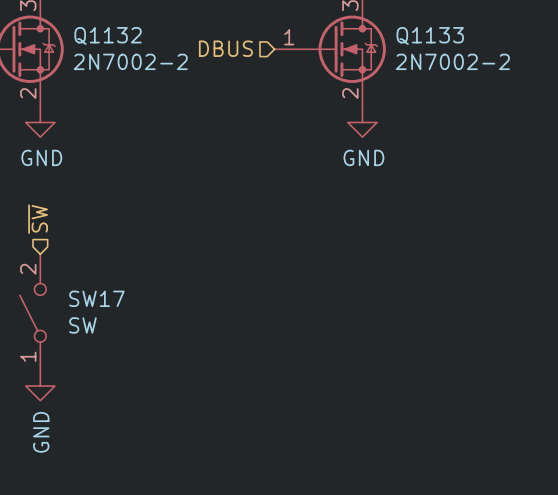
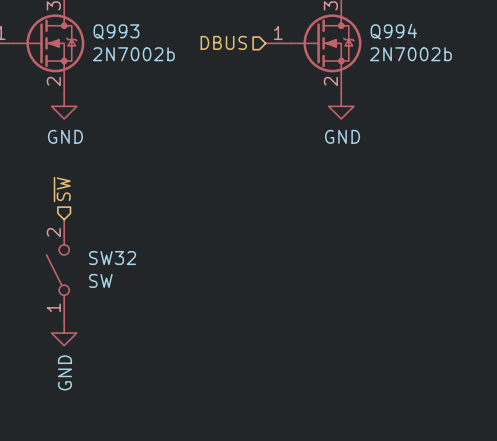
Q1132 name: Q1132 (108, 35) -> Q993 (116, 31)
Q1133 name: Q1133 (430, 35) -> Q994 (393, 31)
Q1132 value: 2N7002-2 (130, 61) -> 2N7002b (133, 54)
Q1133 value: 2N7002-2 (452, 61) -> 2N7002b (410, 54)
SW17 name: SW17 (96, 298) -> SW32 (112, 258)

